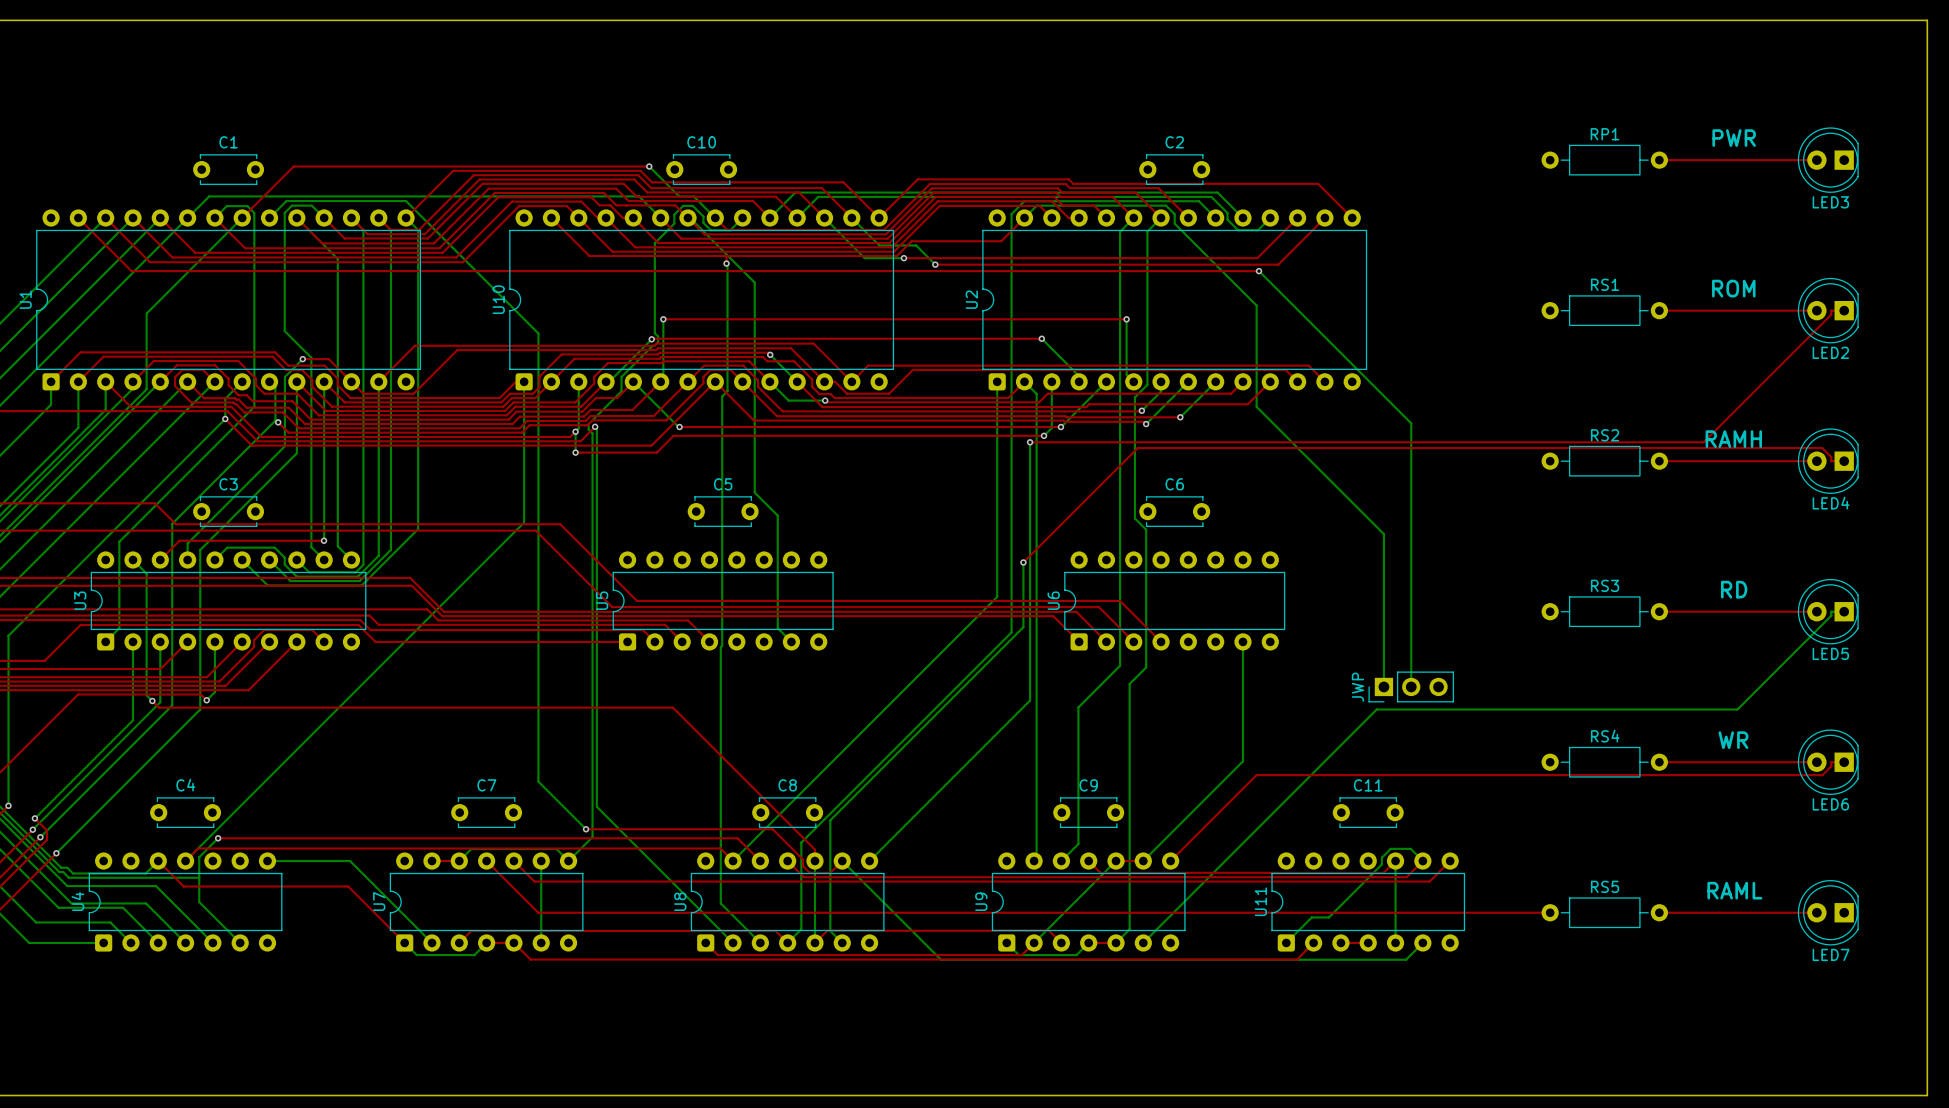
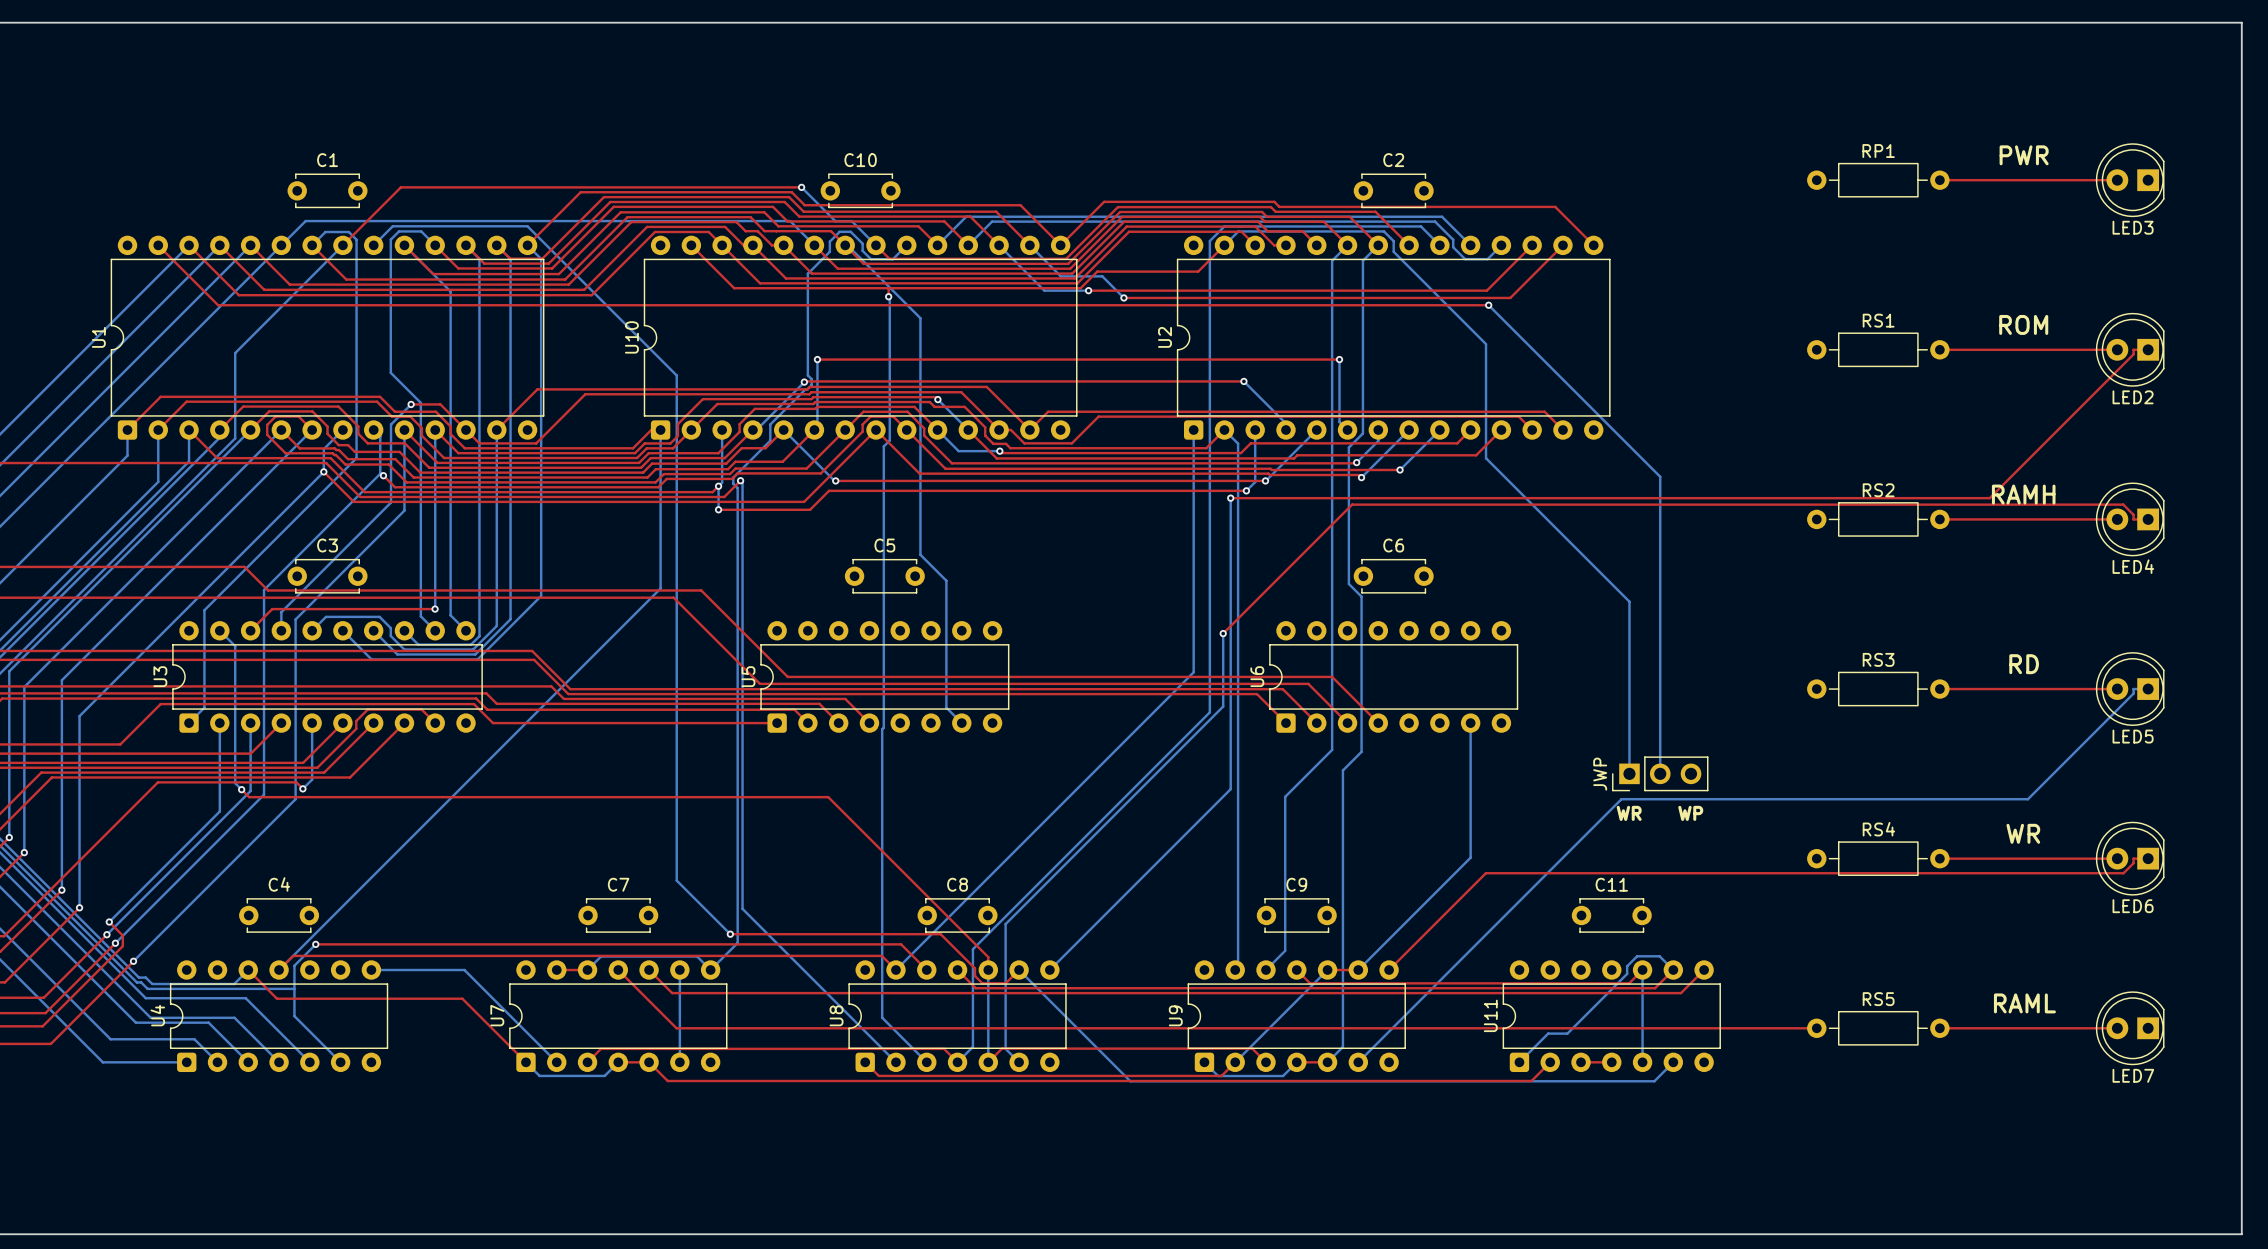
text: none -> WR (1629, 813)
text: none -> WP (1690, 813)

